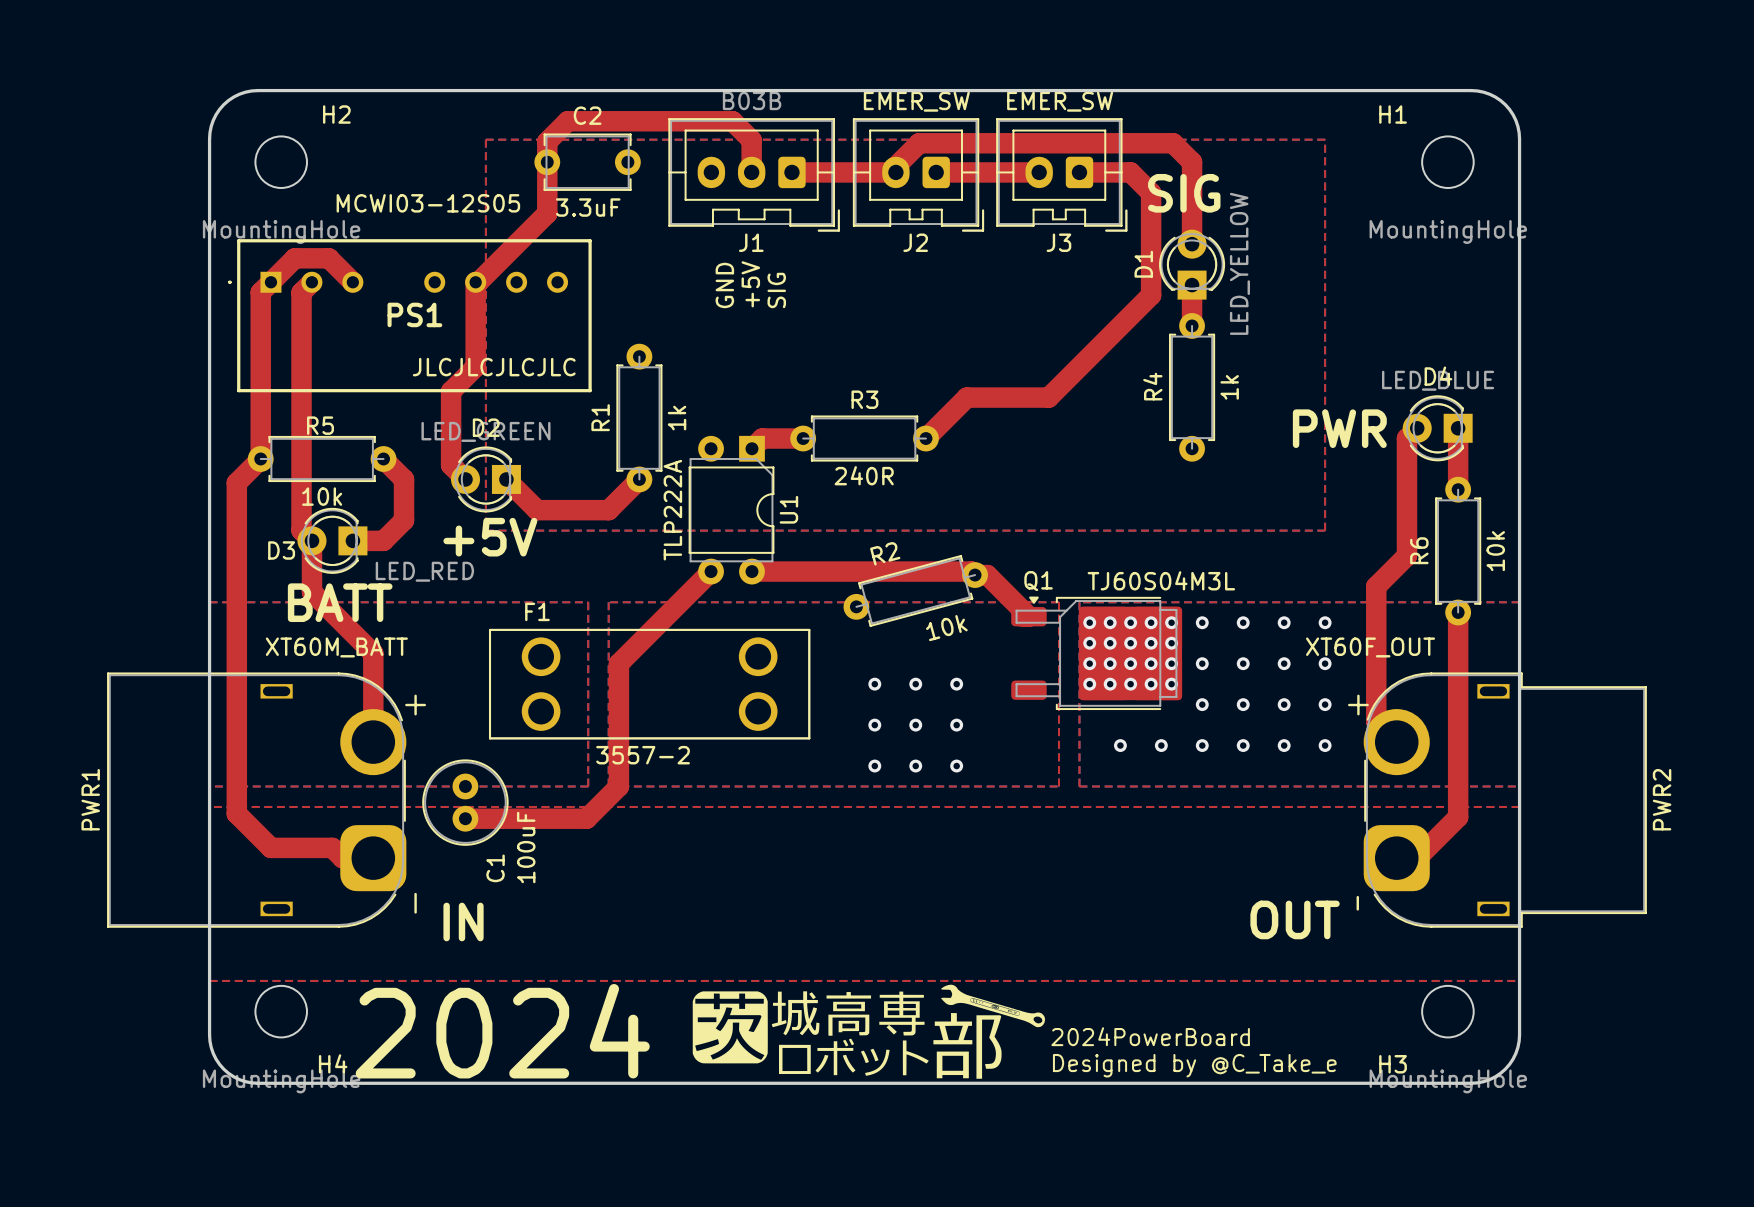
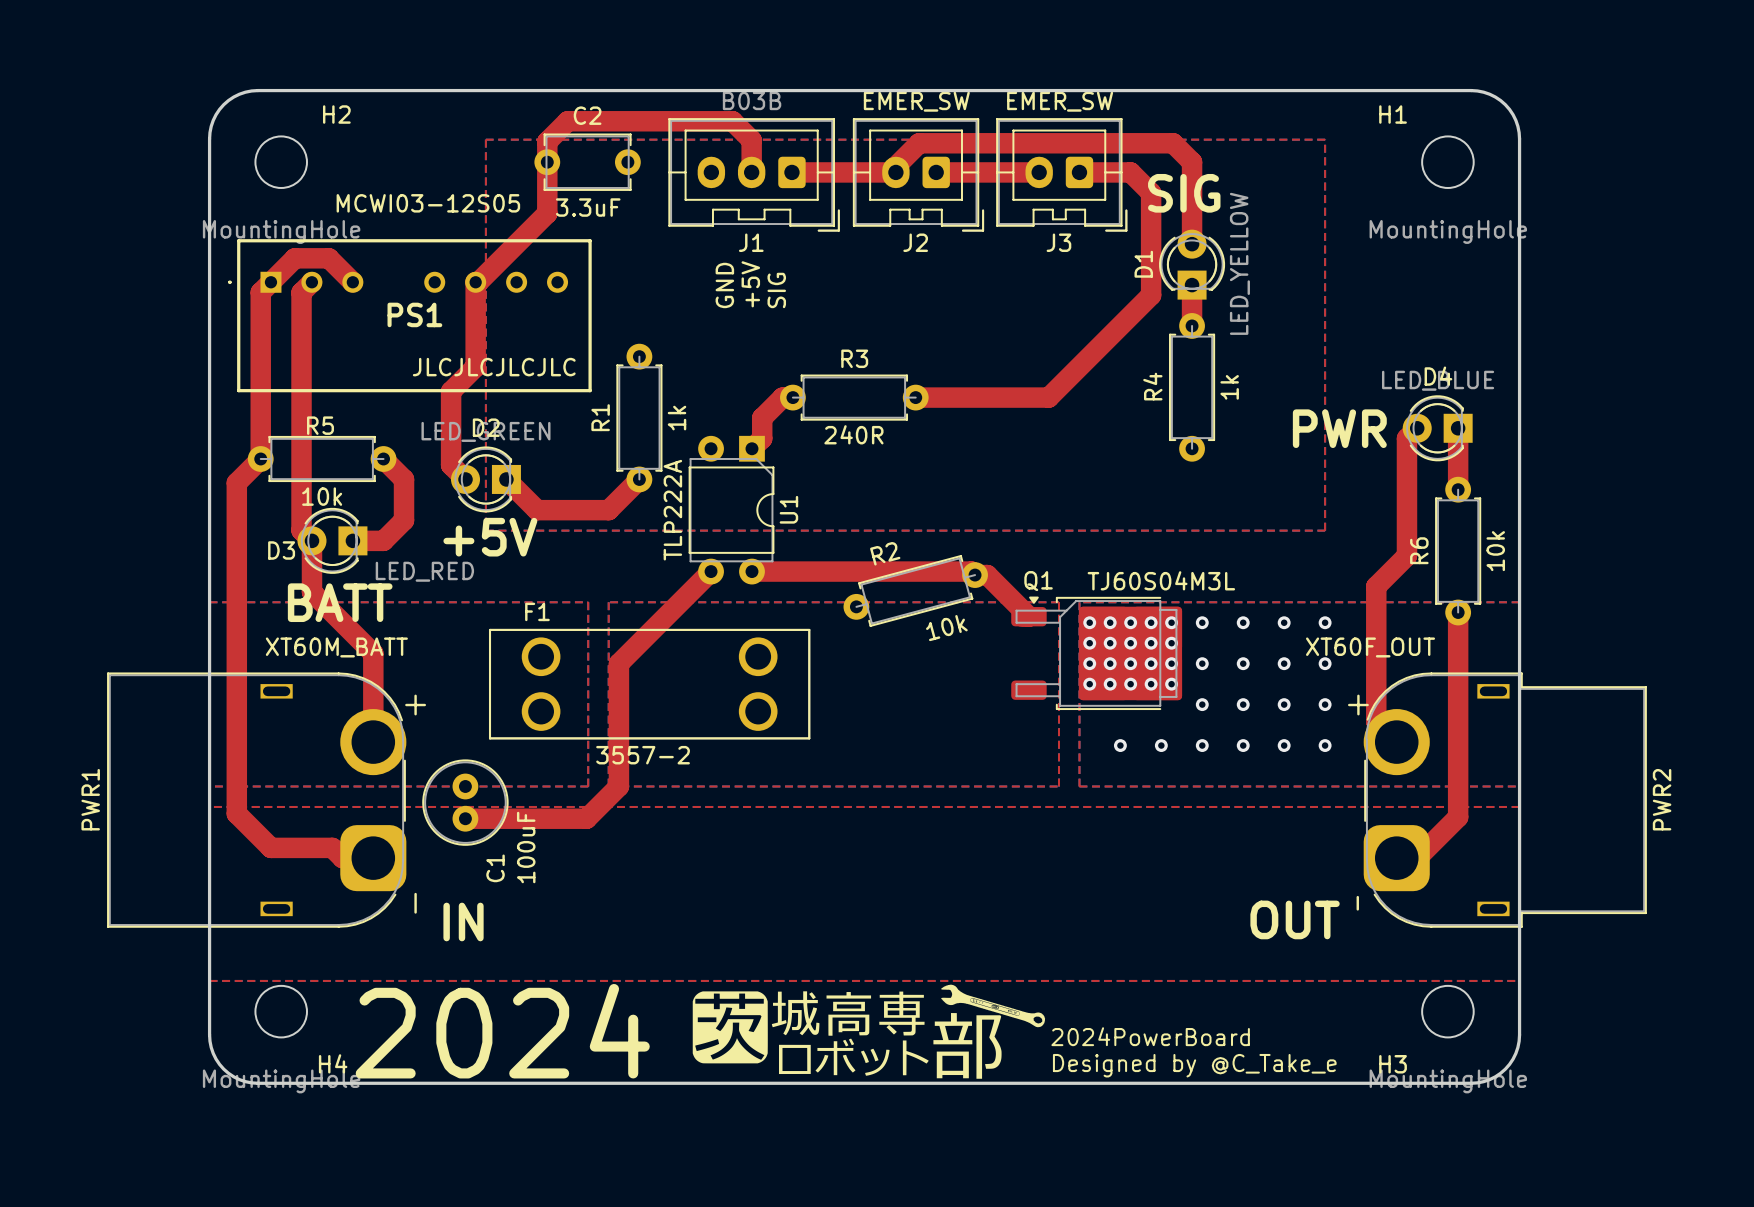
top track: (966, 397) (925, 438) -> (966, 397) (915, 397)
top track: (762, 438) (803, 438) -> (762, 438) (762, 418) (782, 397) (792, 397)
R3 position: (864, 438) -> (854, 397)
via: (874, 684) -> none
via: (915, 684) -> none
via: (956, 684) -> none
via: (874, 725) -> none
via: (915, 725) -> none
via: (956, 725) -> none
via: (874, 766) -> none
via: (915, 766) -> none
via: (956, 766) -> none

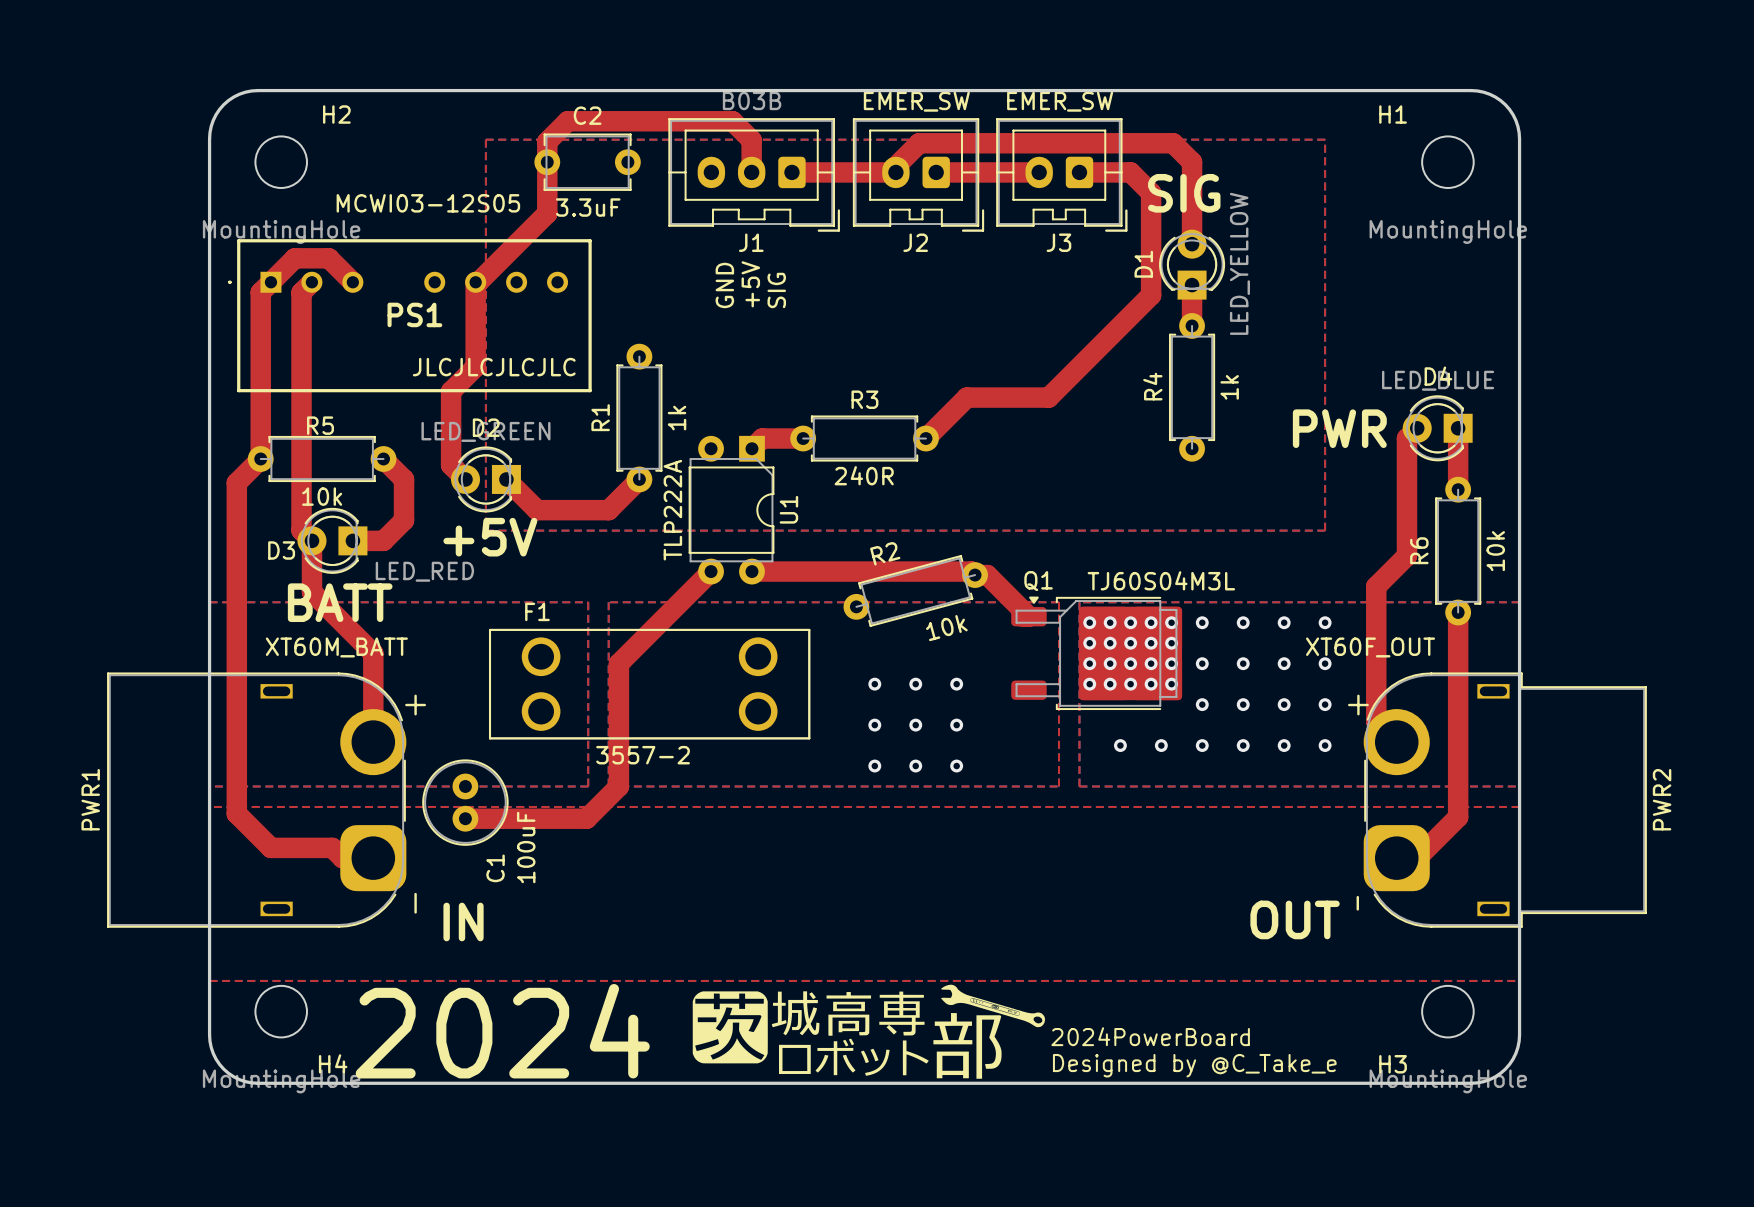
top track: (792, 397) (782, 397) (762, 418) (762, 438) -> (803, 438) (762, 438)
R3 position: (854, 397) -> (864, 438)
top track: (915, 397) (966, 397) -> (925, 438) (966, 397)
via: none -> (874, 684)
via: none -> (915, 684)
via: none -> (956, 684)
via: none -> (874, 725)
via: none -> (915, 725)
via: none -> (956, 725)
via: none -> (874, 766)
via: none -> (915, 766)
via: none -> (956, 766)

